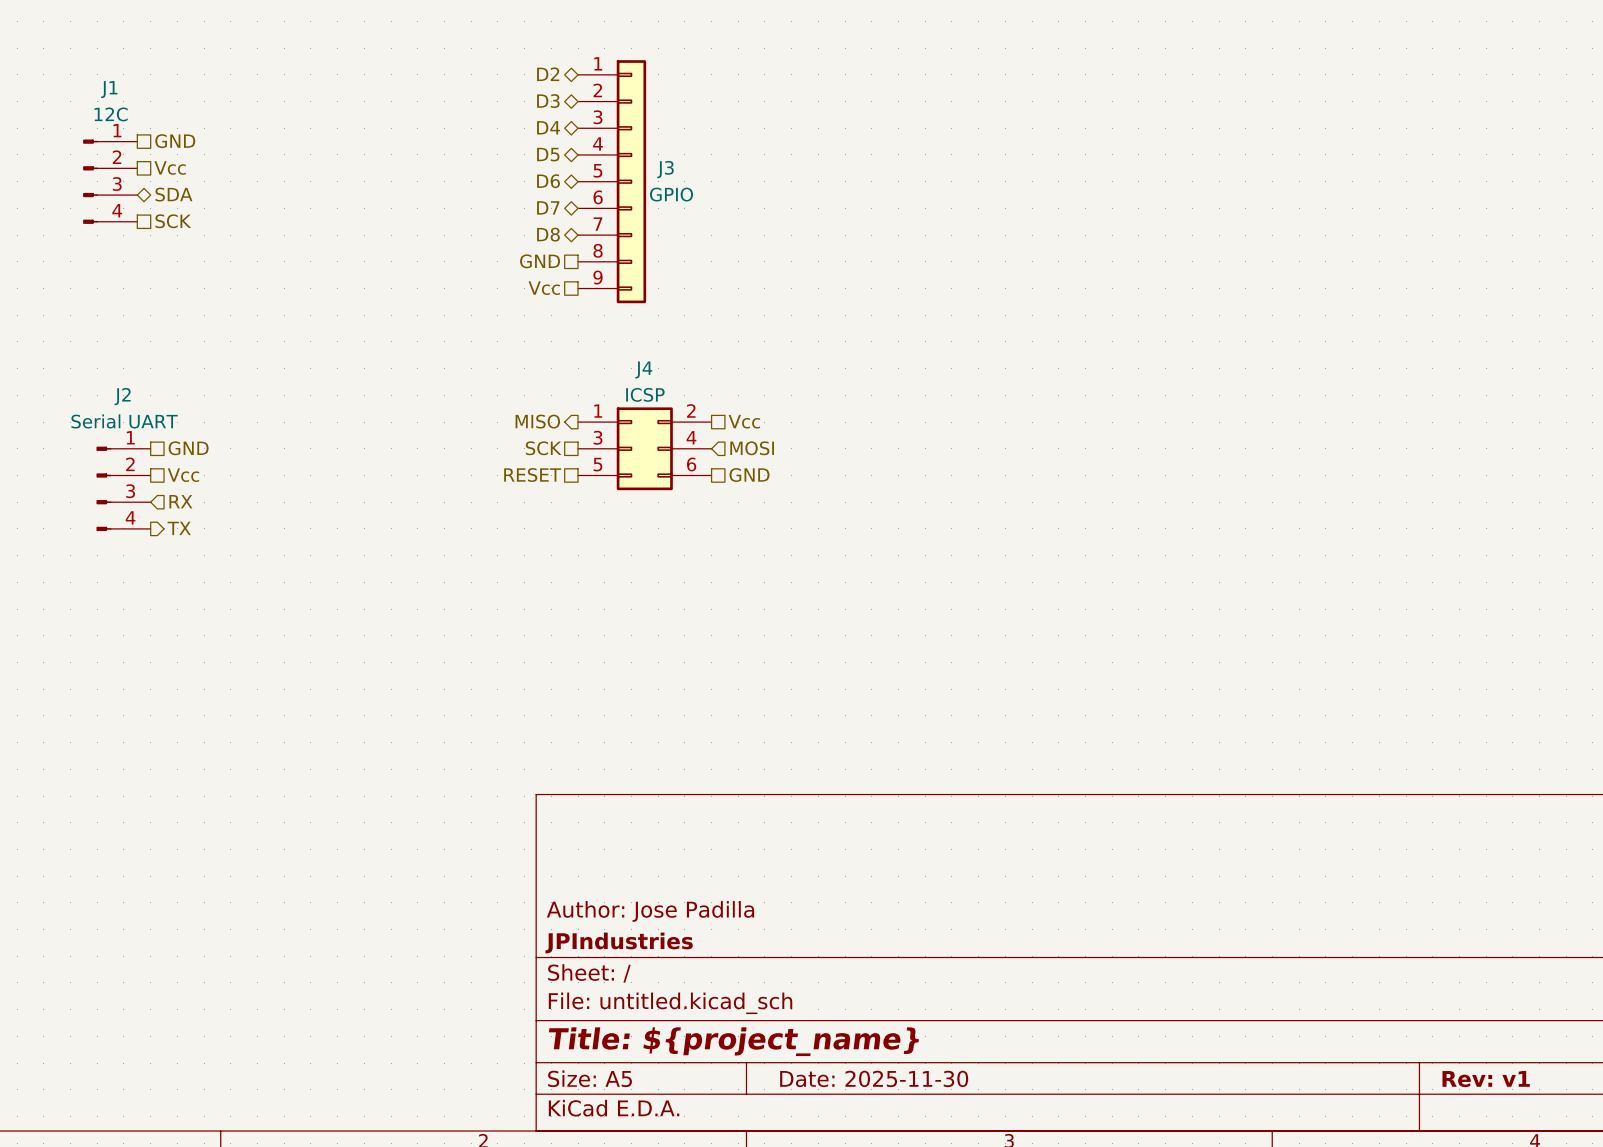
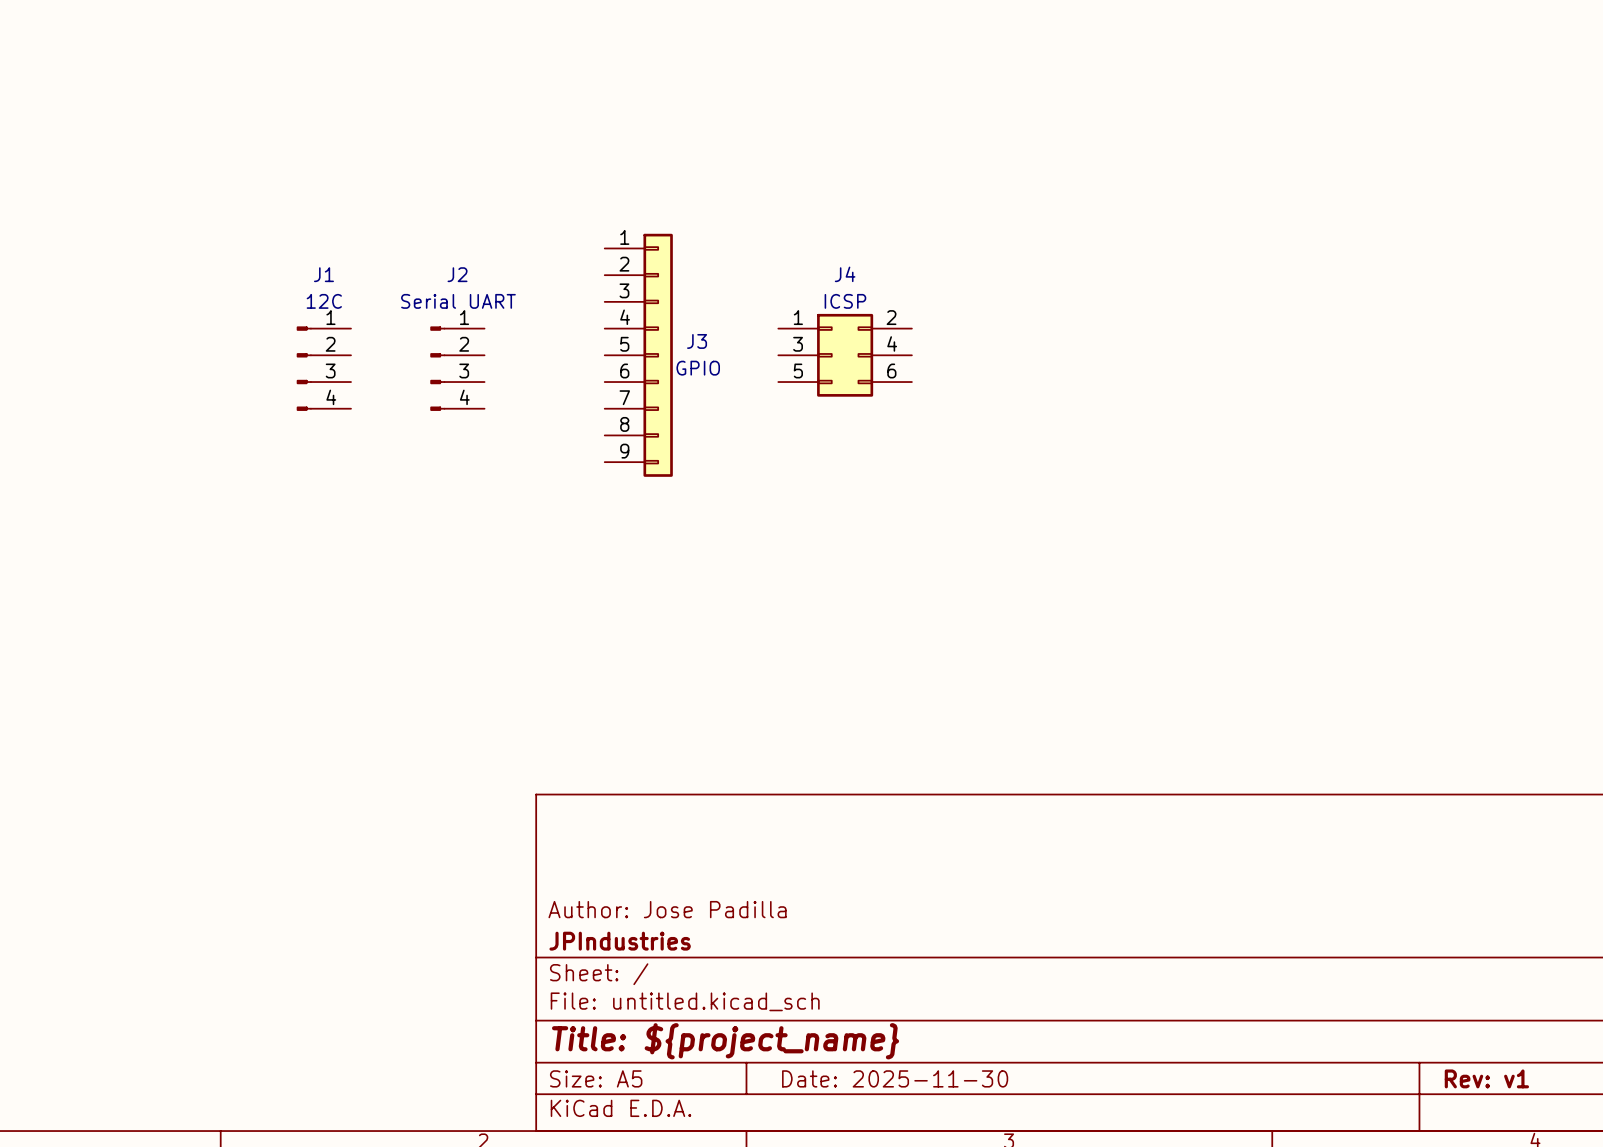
hierarchical label: D2 (548, 74) -> none
hierarchical label: D3 (548, 101) -> none
hierarchical label: D4 (548, 127) -> none
hierarchical label: GND (175, 141) -> none
hierarchical label: D5 (548, 154) -> none
hierarchical label: Vcc (170, 167) -> none
J1 position: (110, 181) -> (323, 368)
hierarchical label: D6 (548, 181) -> none
J3 position: (612, 181) -> (638, 355)
hierarchical label: SDA (173, 194) -> none
hierarchical label: D7 (548, 207) -> none
hierarchical label: SCK (173, 221) -> none
hierarchical label: D8 (548, 234) -> none
hierarchical label: GND (540, 261) -> none
hierarchical label: Vcc (544, 288) -> none
hierarchical label: MISO (537, 421) -> none
hierarchical label: Vcc (744, 421) -> none
hierarchical label: GND (188, 448) -> none
hierarchical label: SCK (543, 448) -> none
J4 position: (644, 448) -> (845, 355)
hierarchical label: MOSI (752, 448) -> none
hierarchical label: Vcc (183, 475) -> none
hierarchical label: RESET (532, 475) -> none
hierarchical label: GND (749, 475) -> none
J2 position: (123, 488) -> (457, 368)
hierarchical label: RX (180, 501) -> none
hierarchical label: TX (179, 528) -> none

